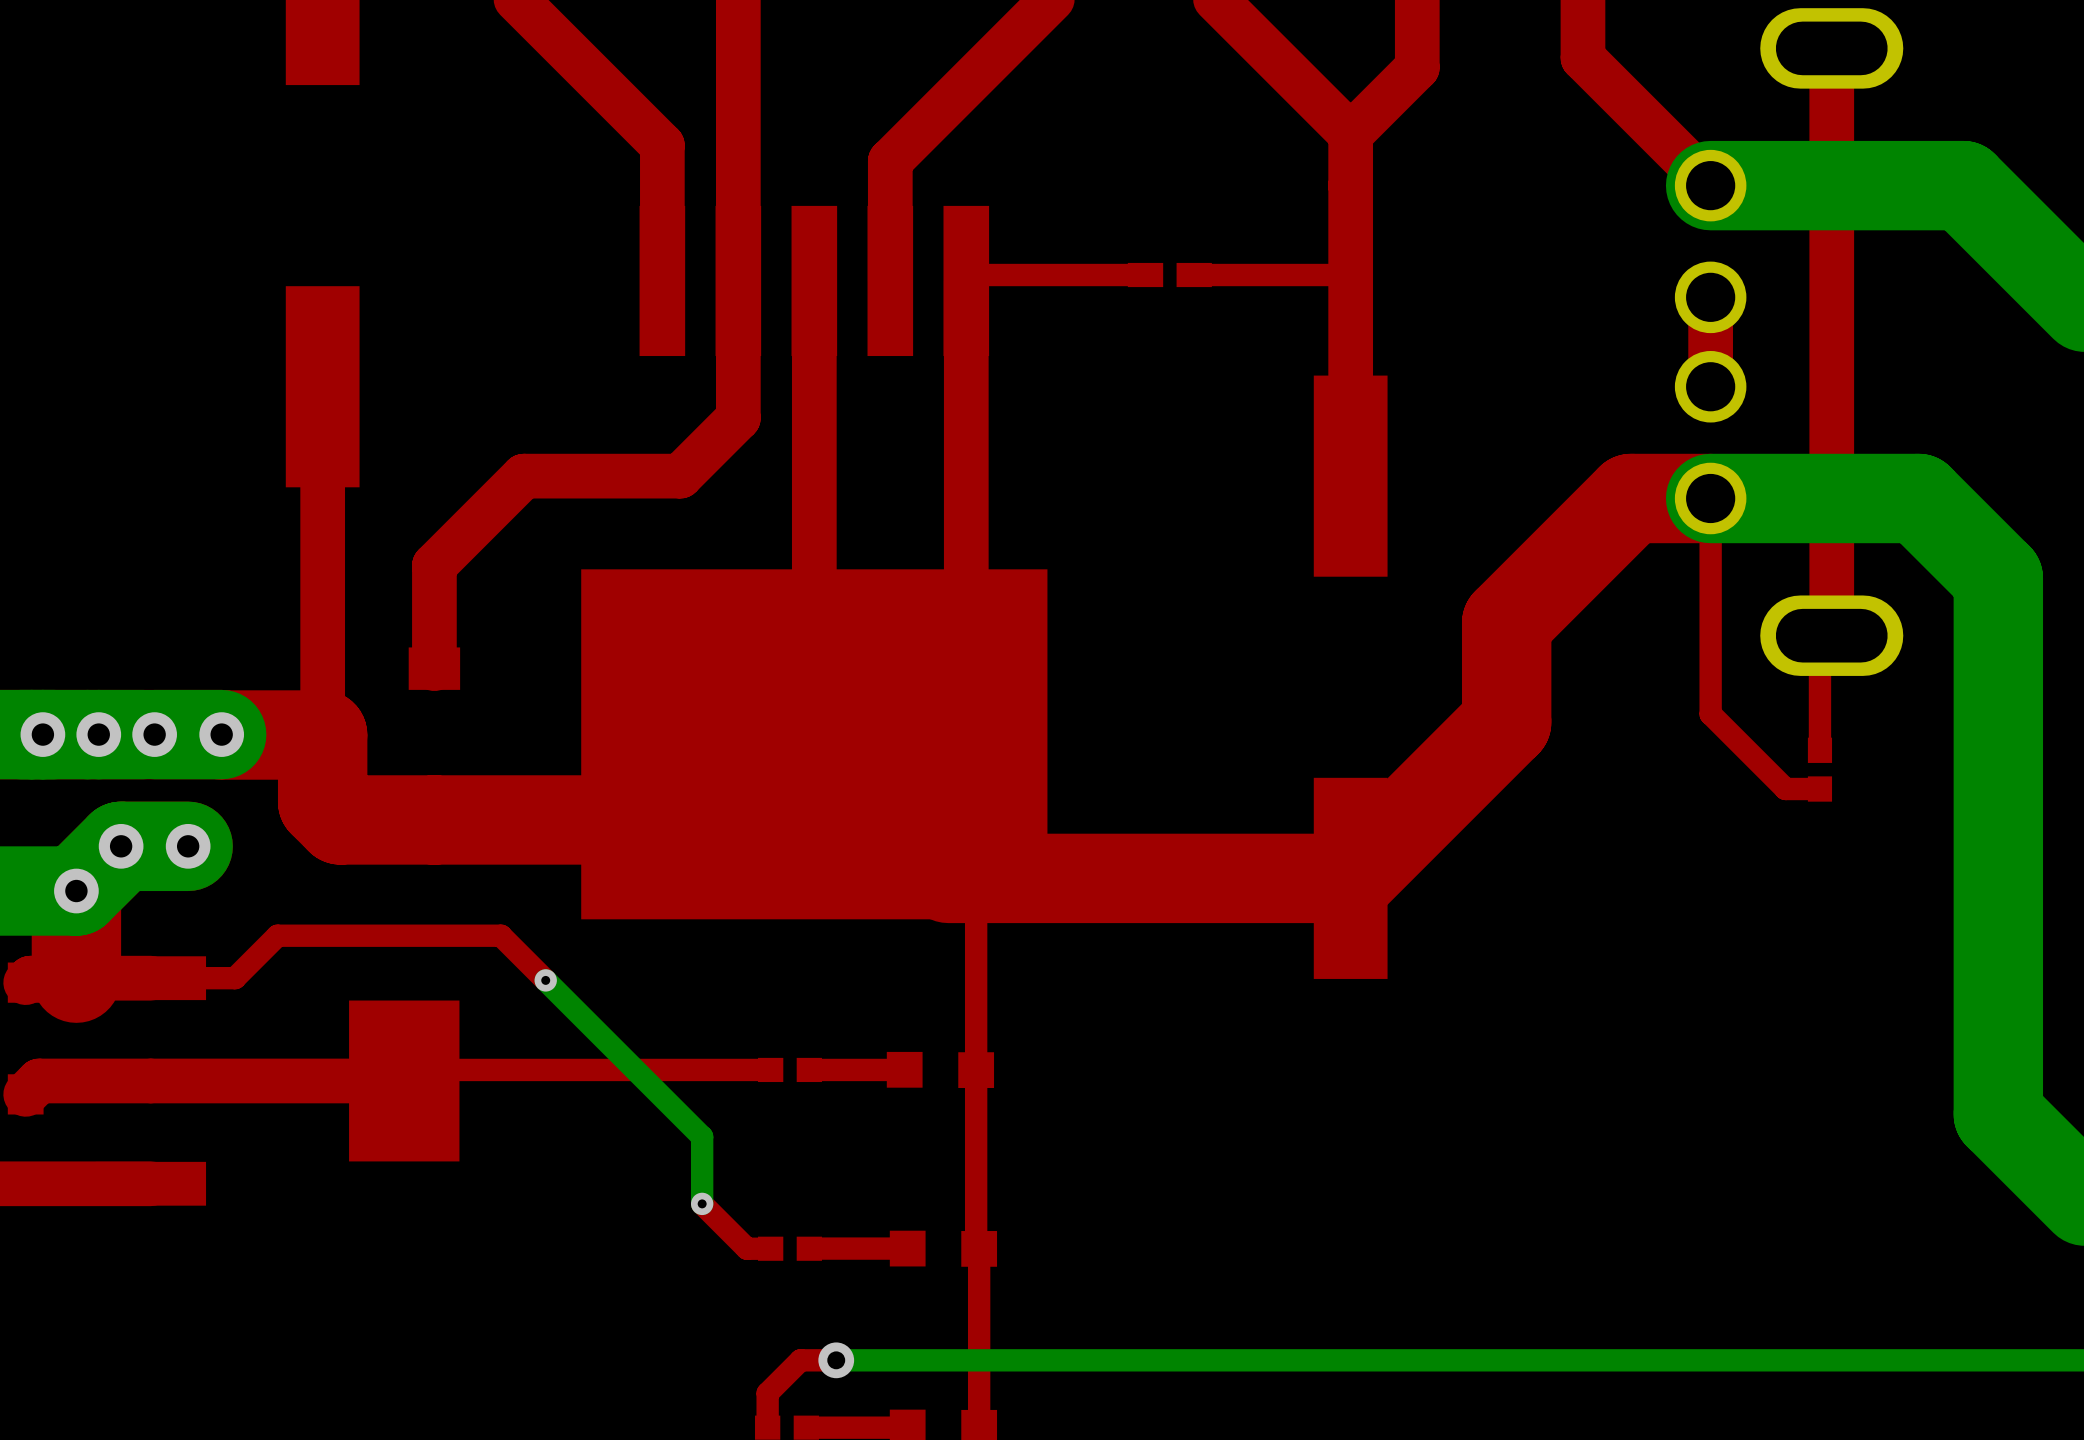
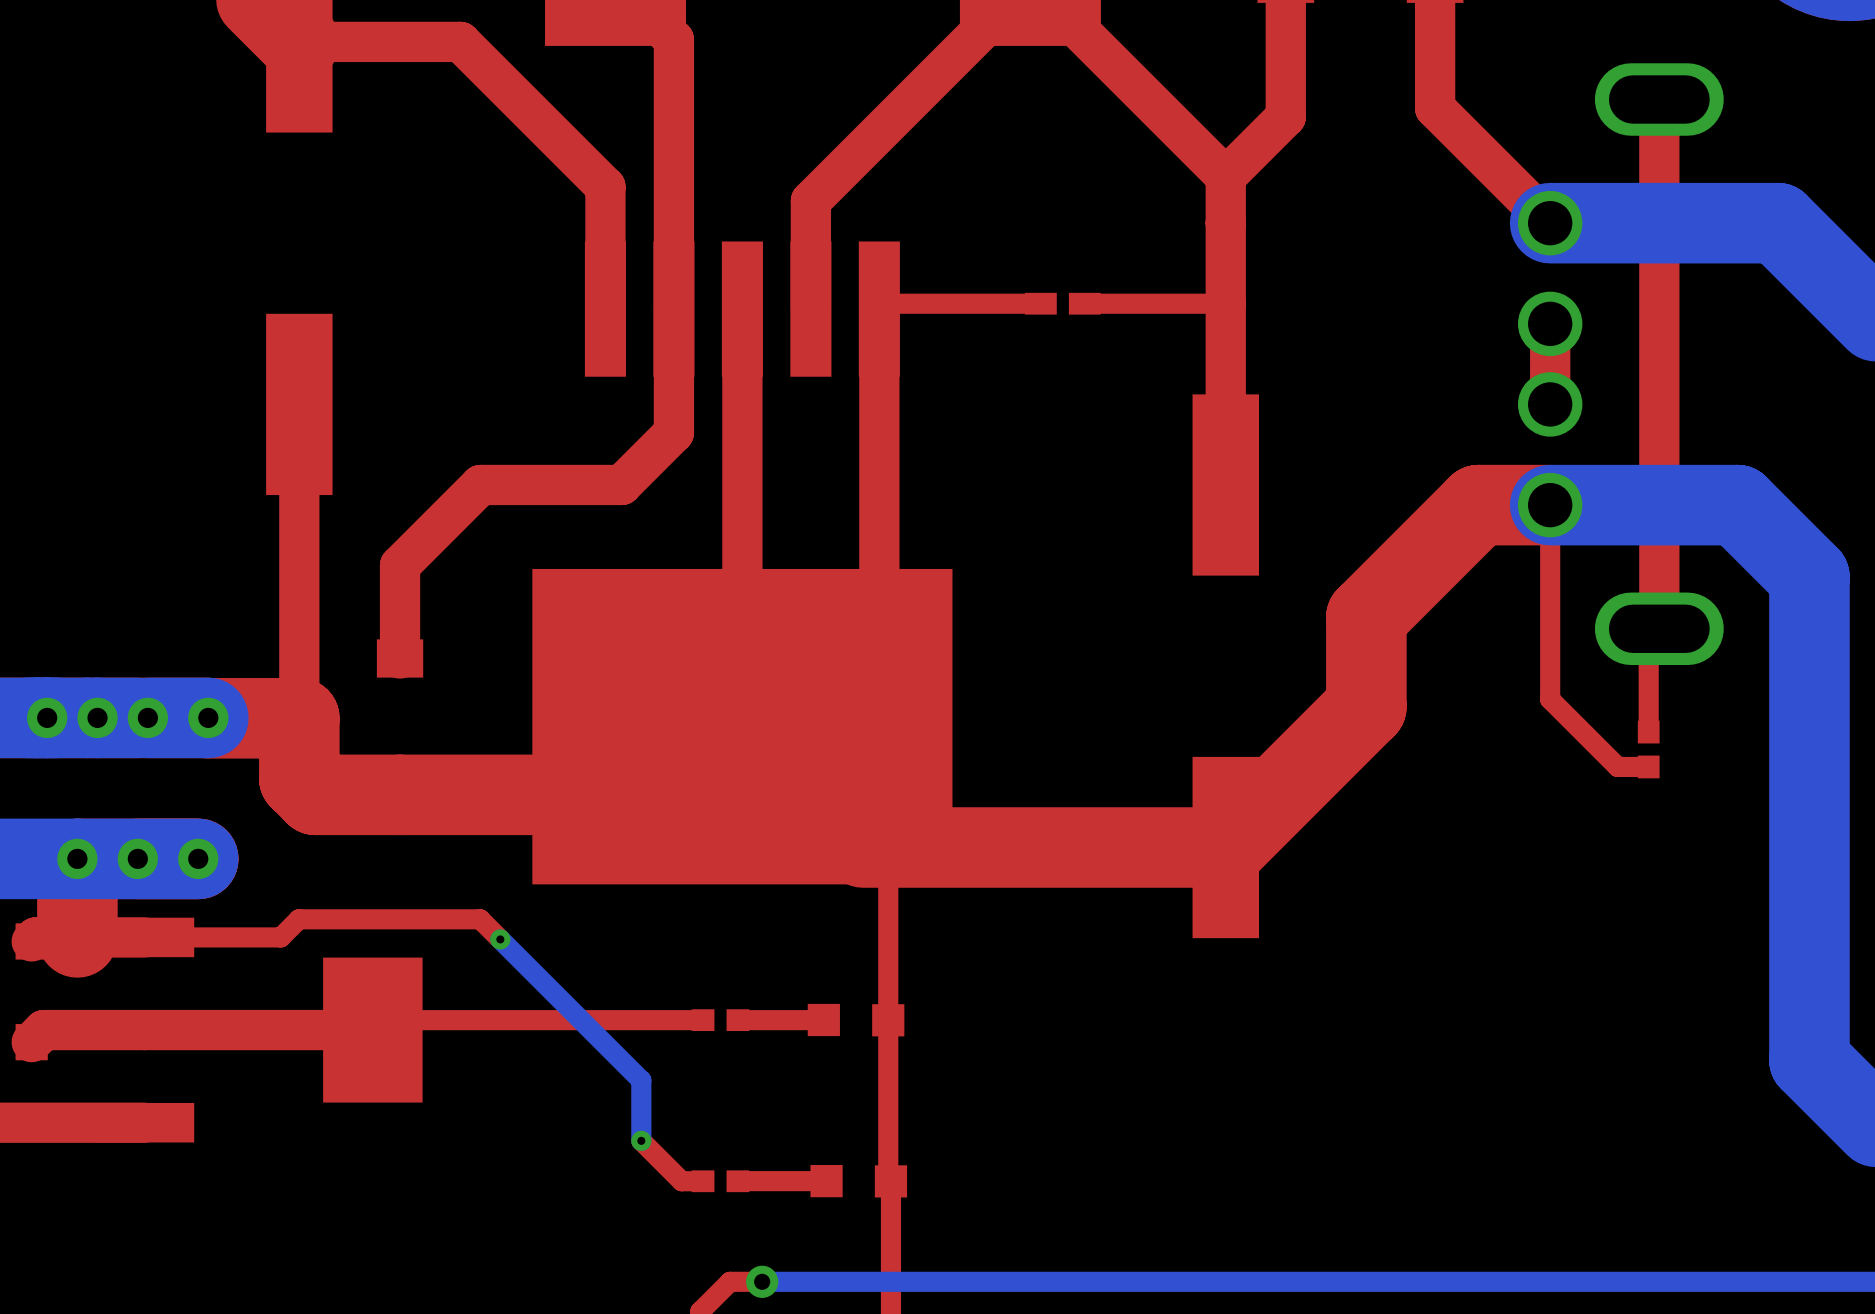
via: (121, 846) -> none
bottom track: (188, 846) (121, 846) (76, 891) -> (198, 858) (77, 858)
via: (188, 846) -> none
via: none -> (137, 858)
via: none -> (198, 858)
top track: (523, 958) (501, 935) (277, 935) (235, 978) -> (480, 919) (298, 919) (280, 937) (220, 937)

